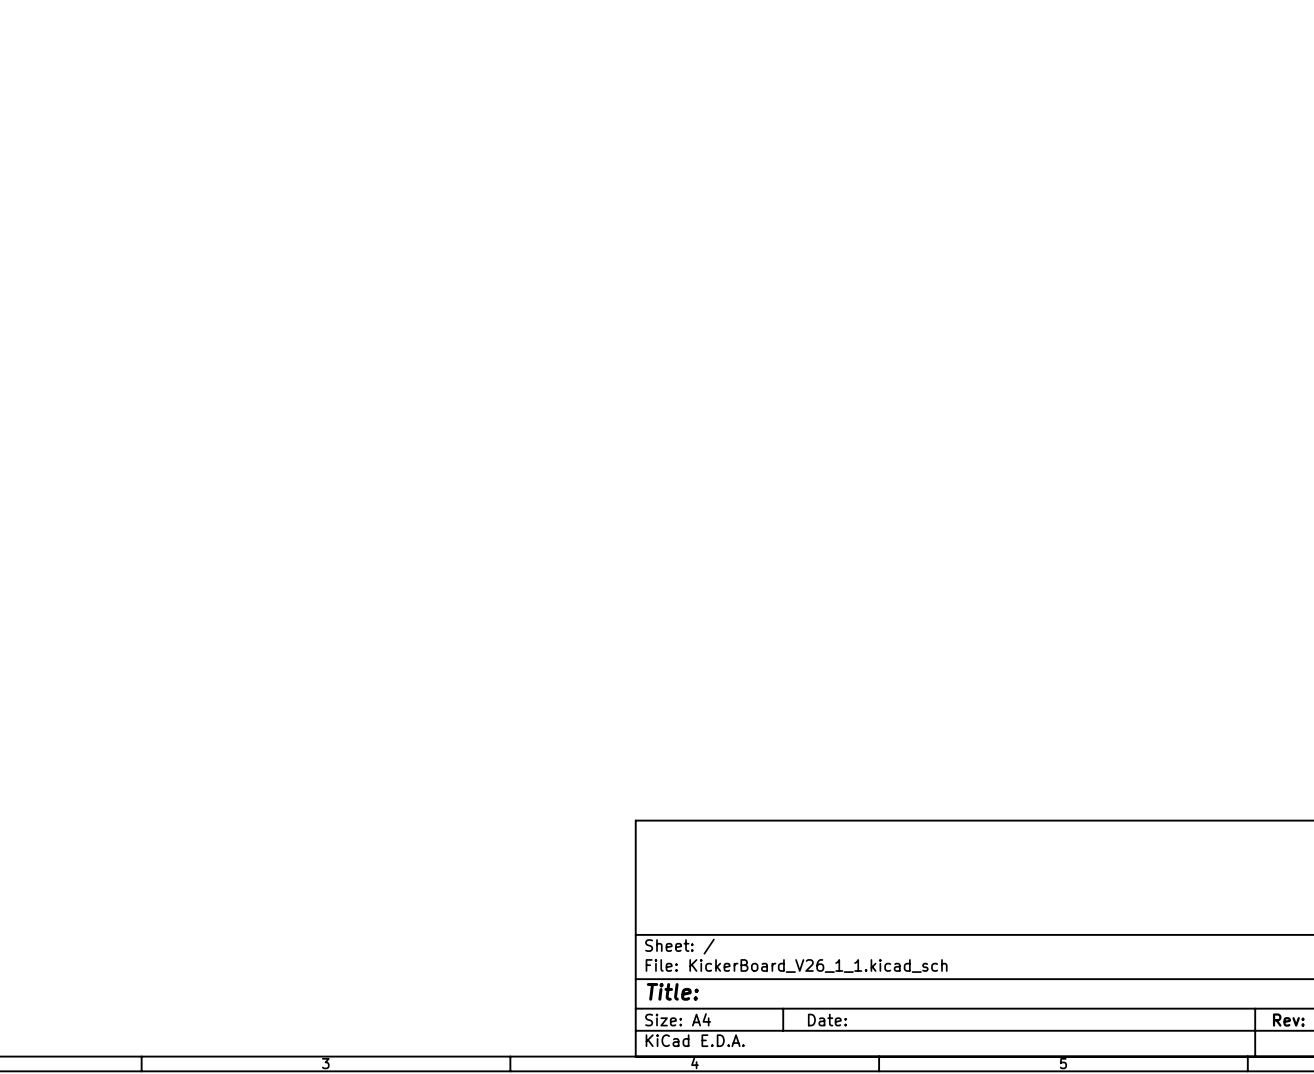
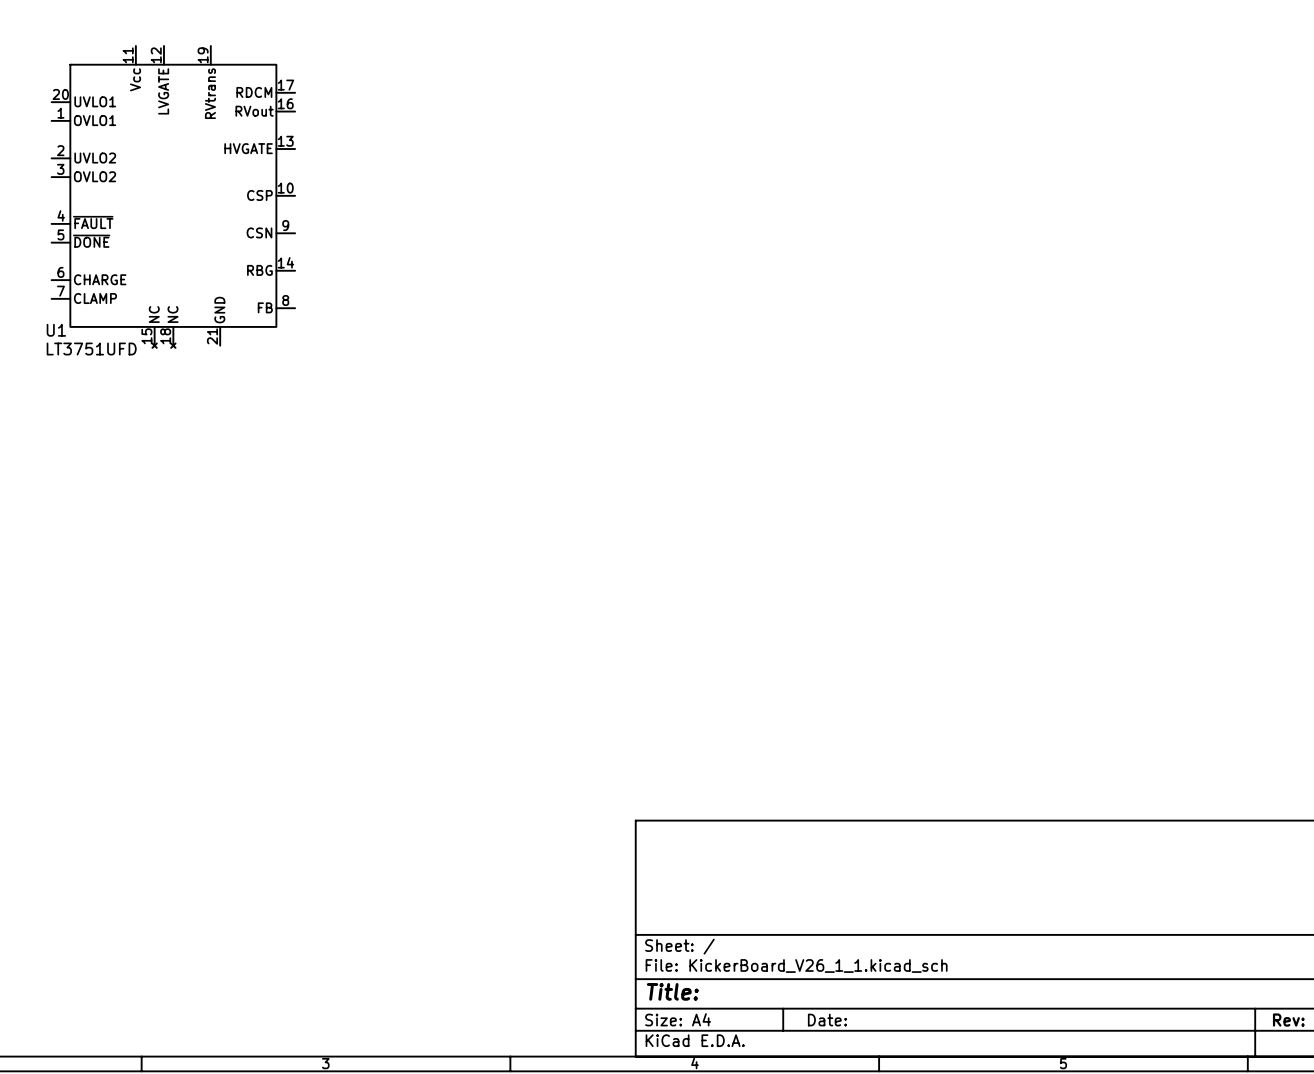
U1: none -> LT3751UFD (173, 196)

